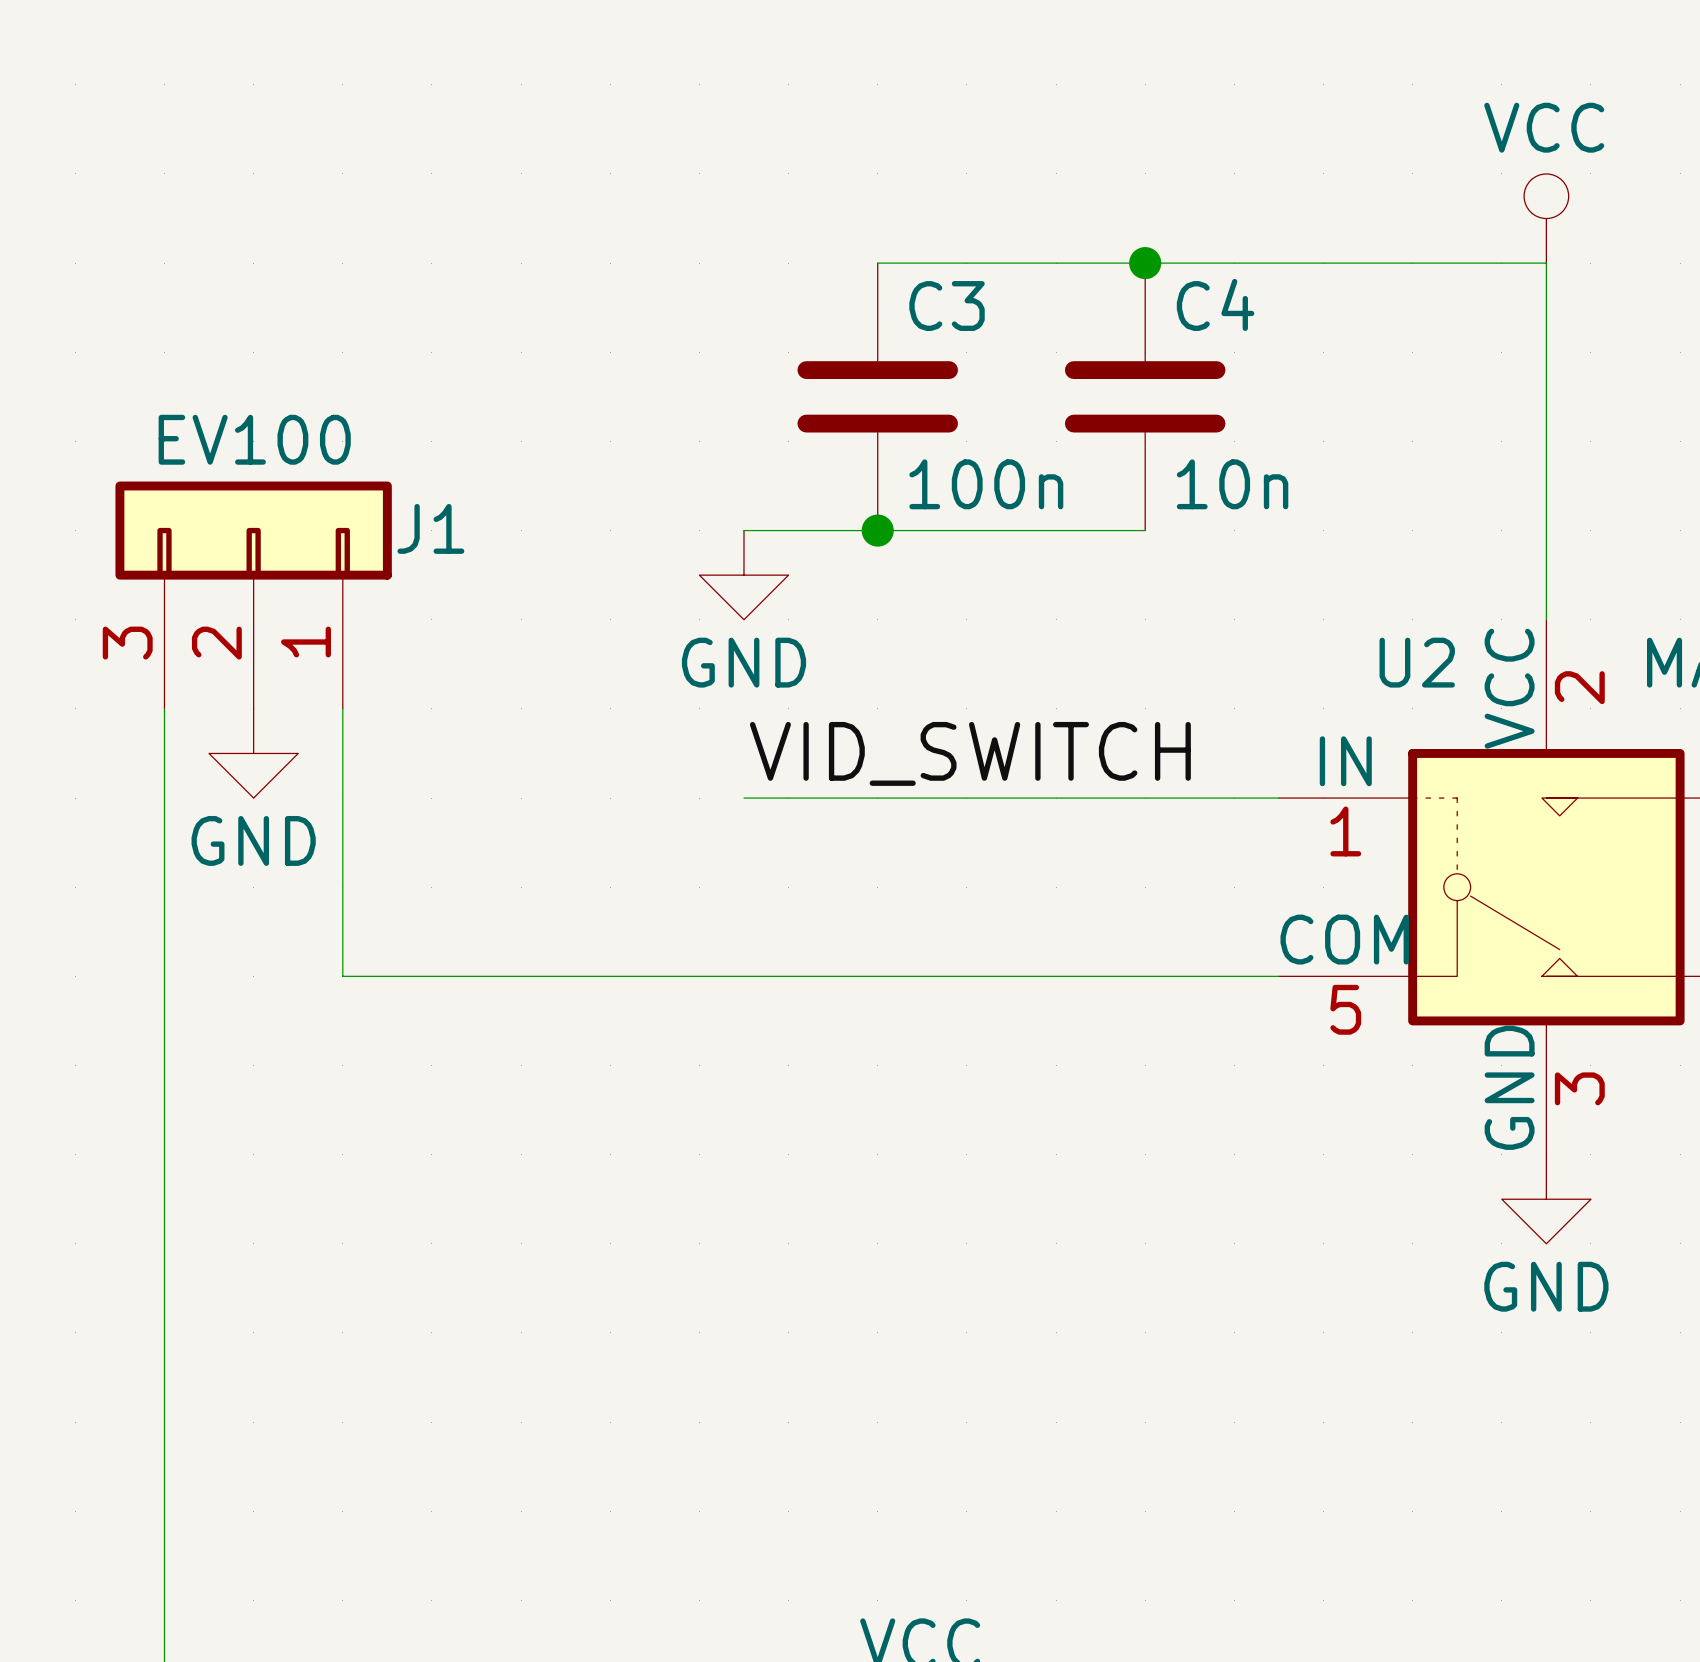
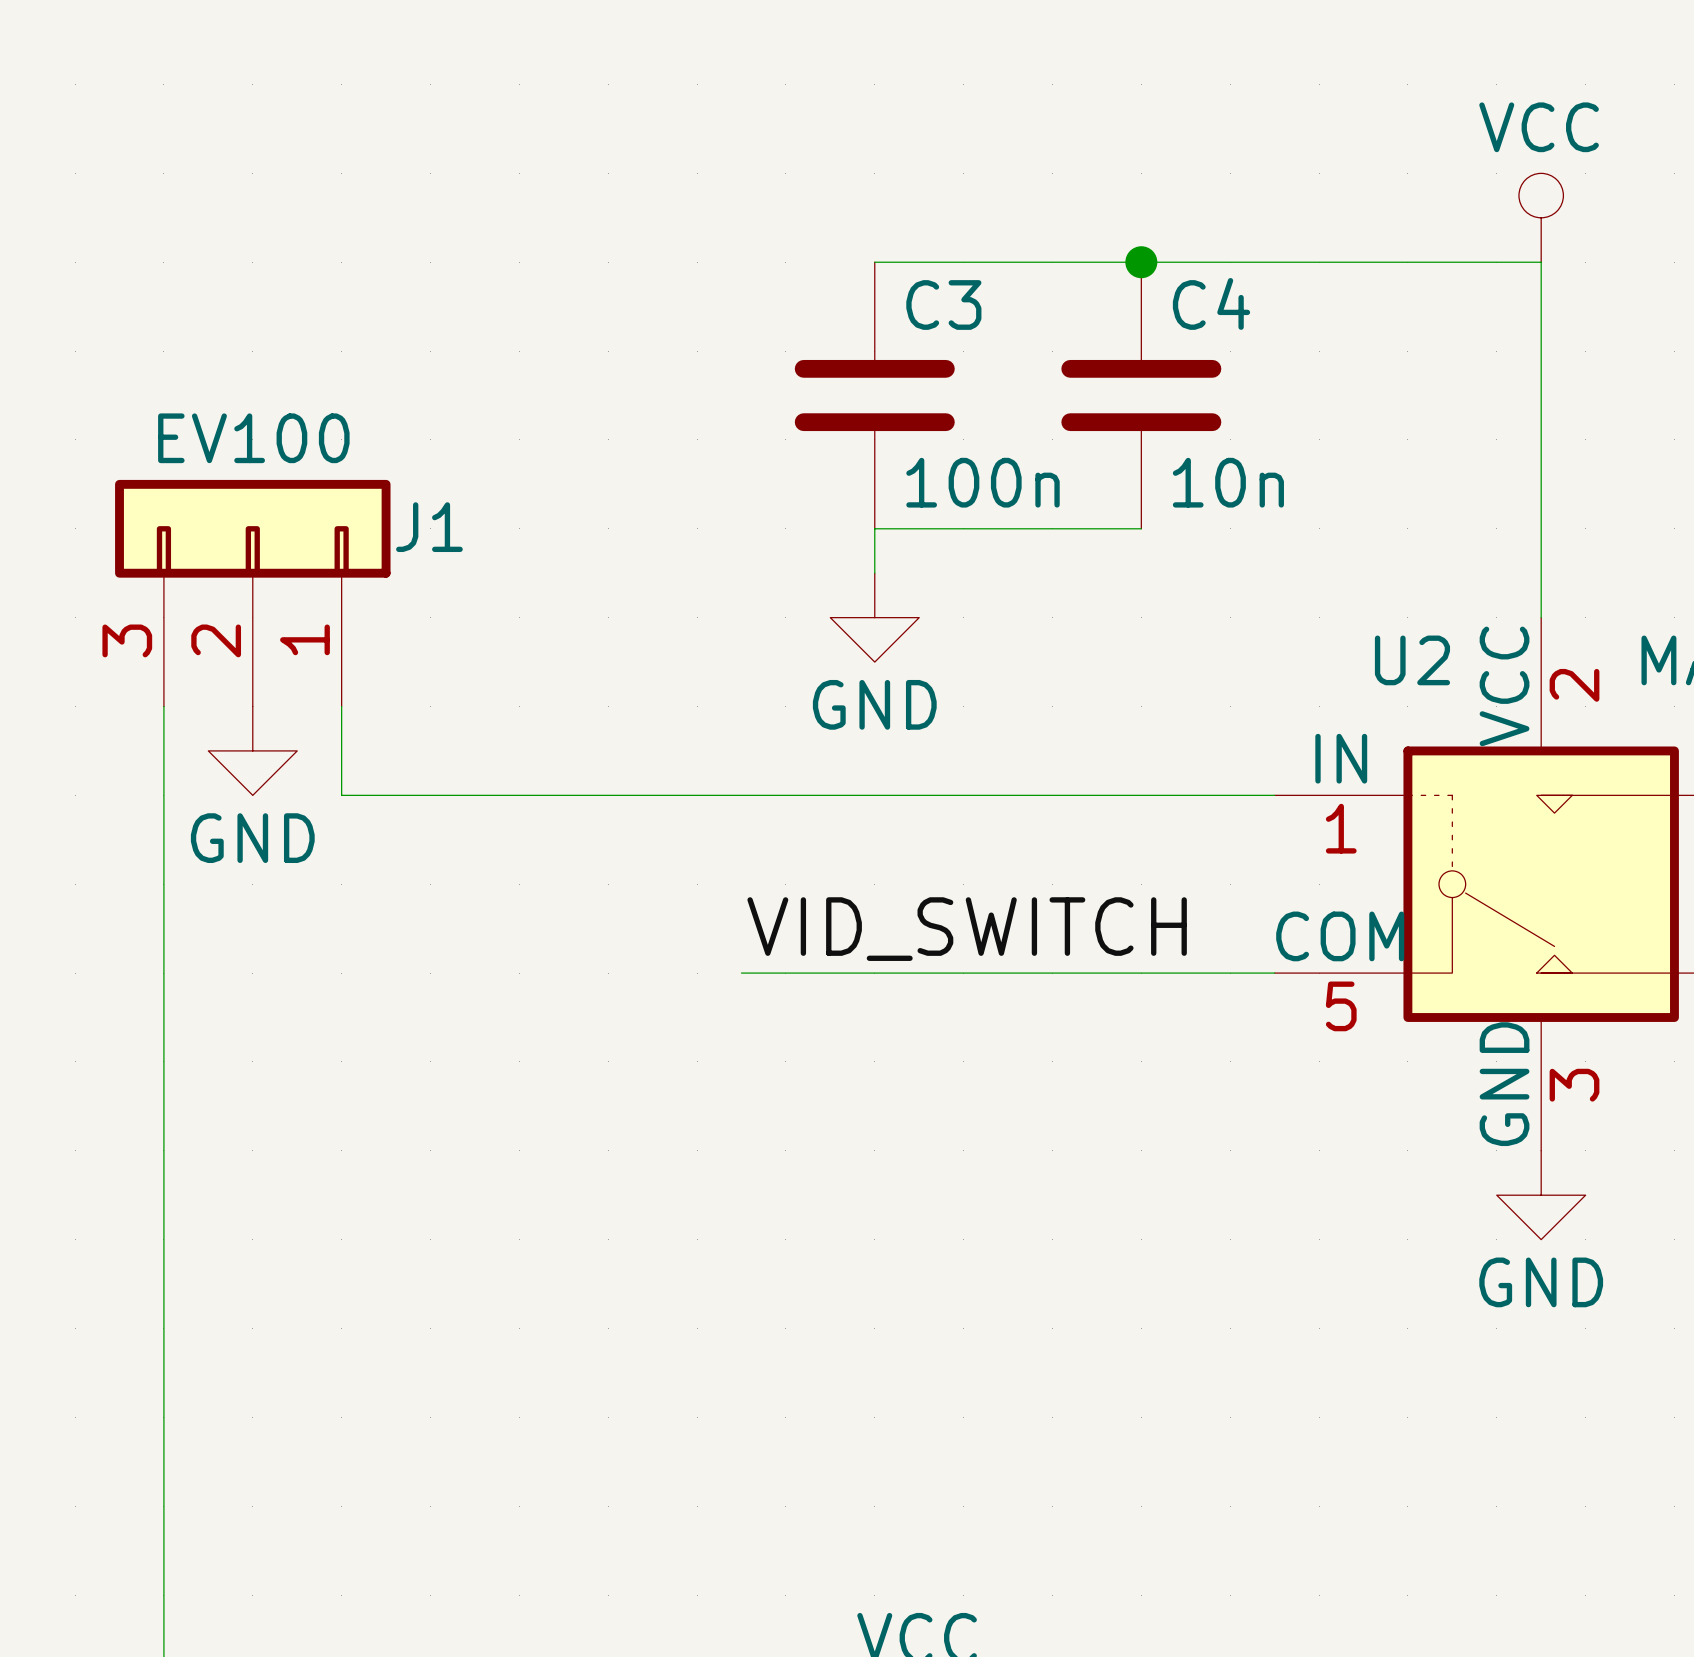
wire: (743, 530) (877, 530) -> (874, 573) (874, 528)
junction: (877, 530) -> none
power symbol position: GND (743, 575) -> GND (874, 617)
label position: VID_SWITCH (970, 753) -> VID_SWITCH (967, 929)
wire: (342, 798) (342, 976) (743, 976) -> (341, 795) (741, 795)

